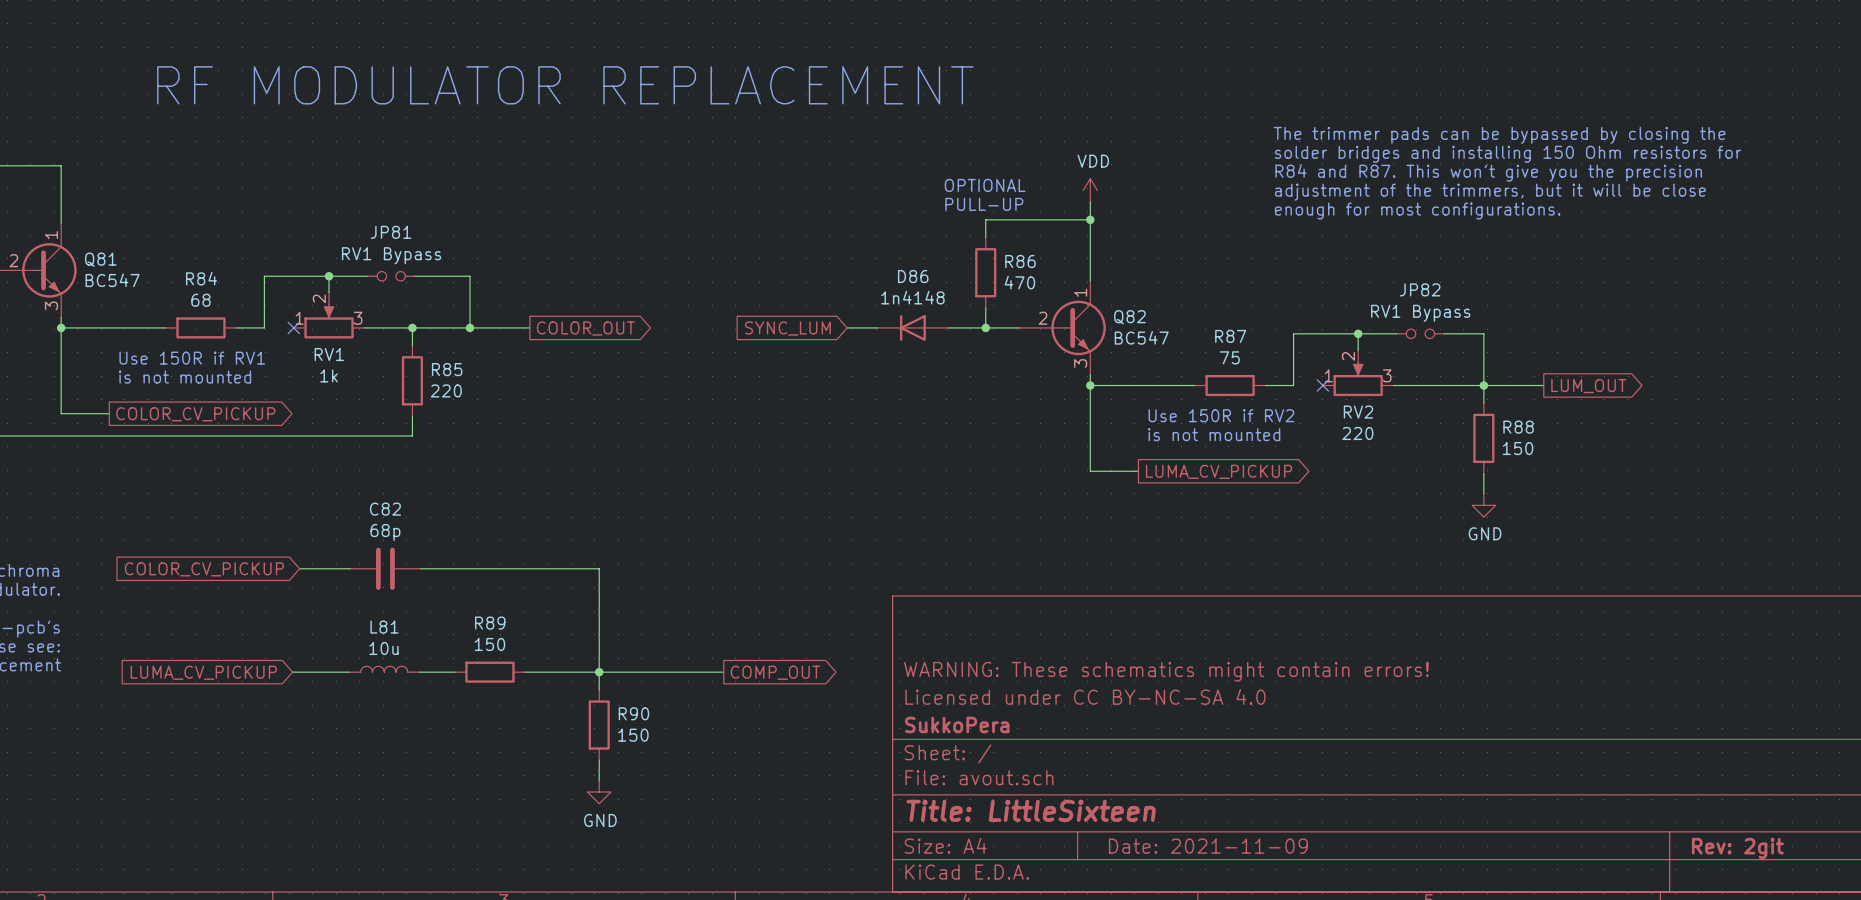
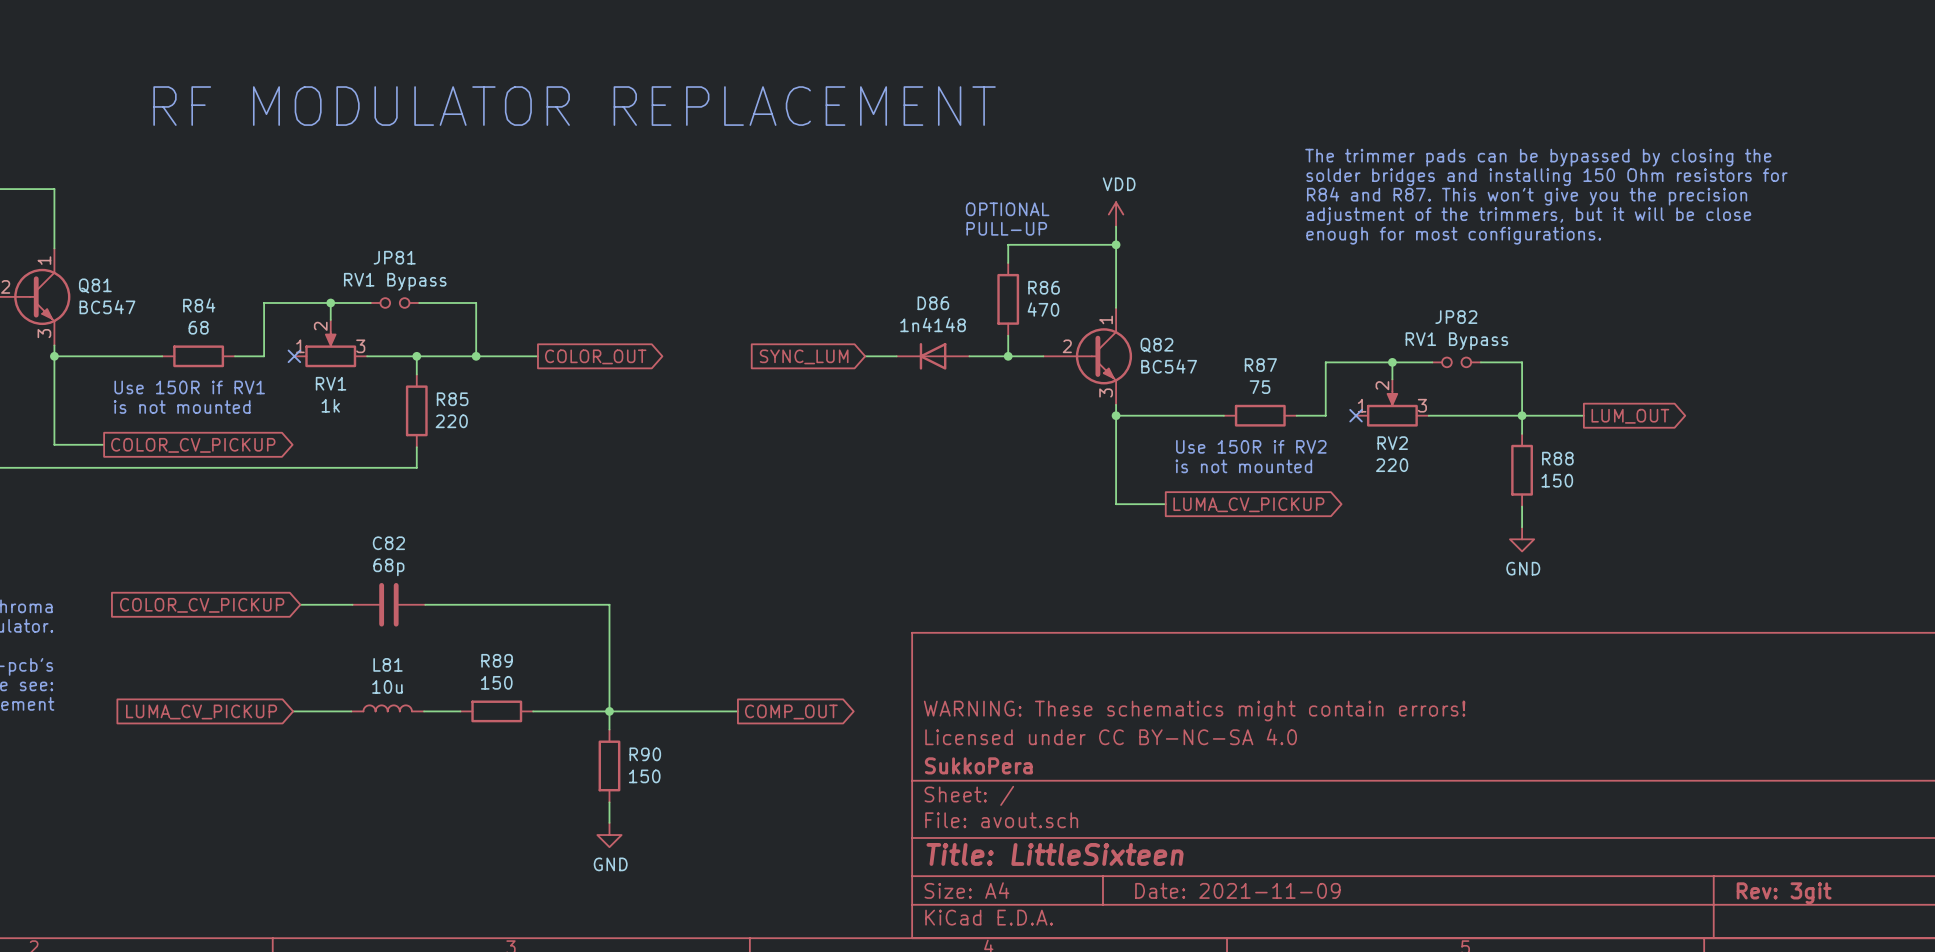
title block: Rev: 2git (1737, 848) -> Rev: 3git (1784, 893)

